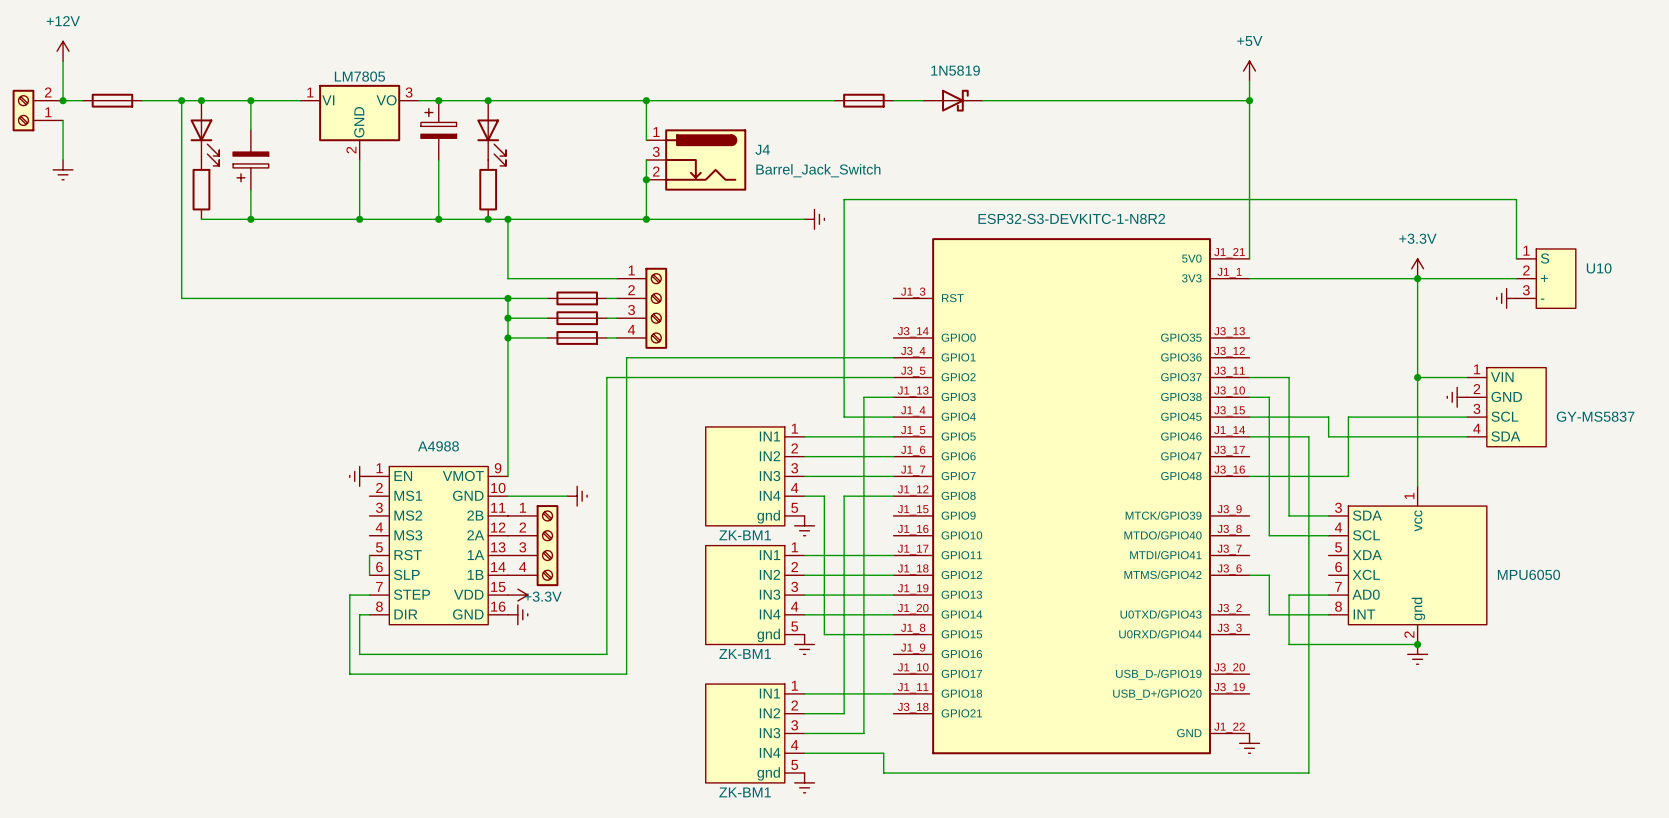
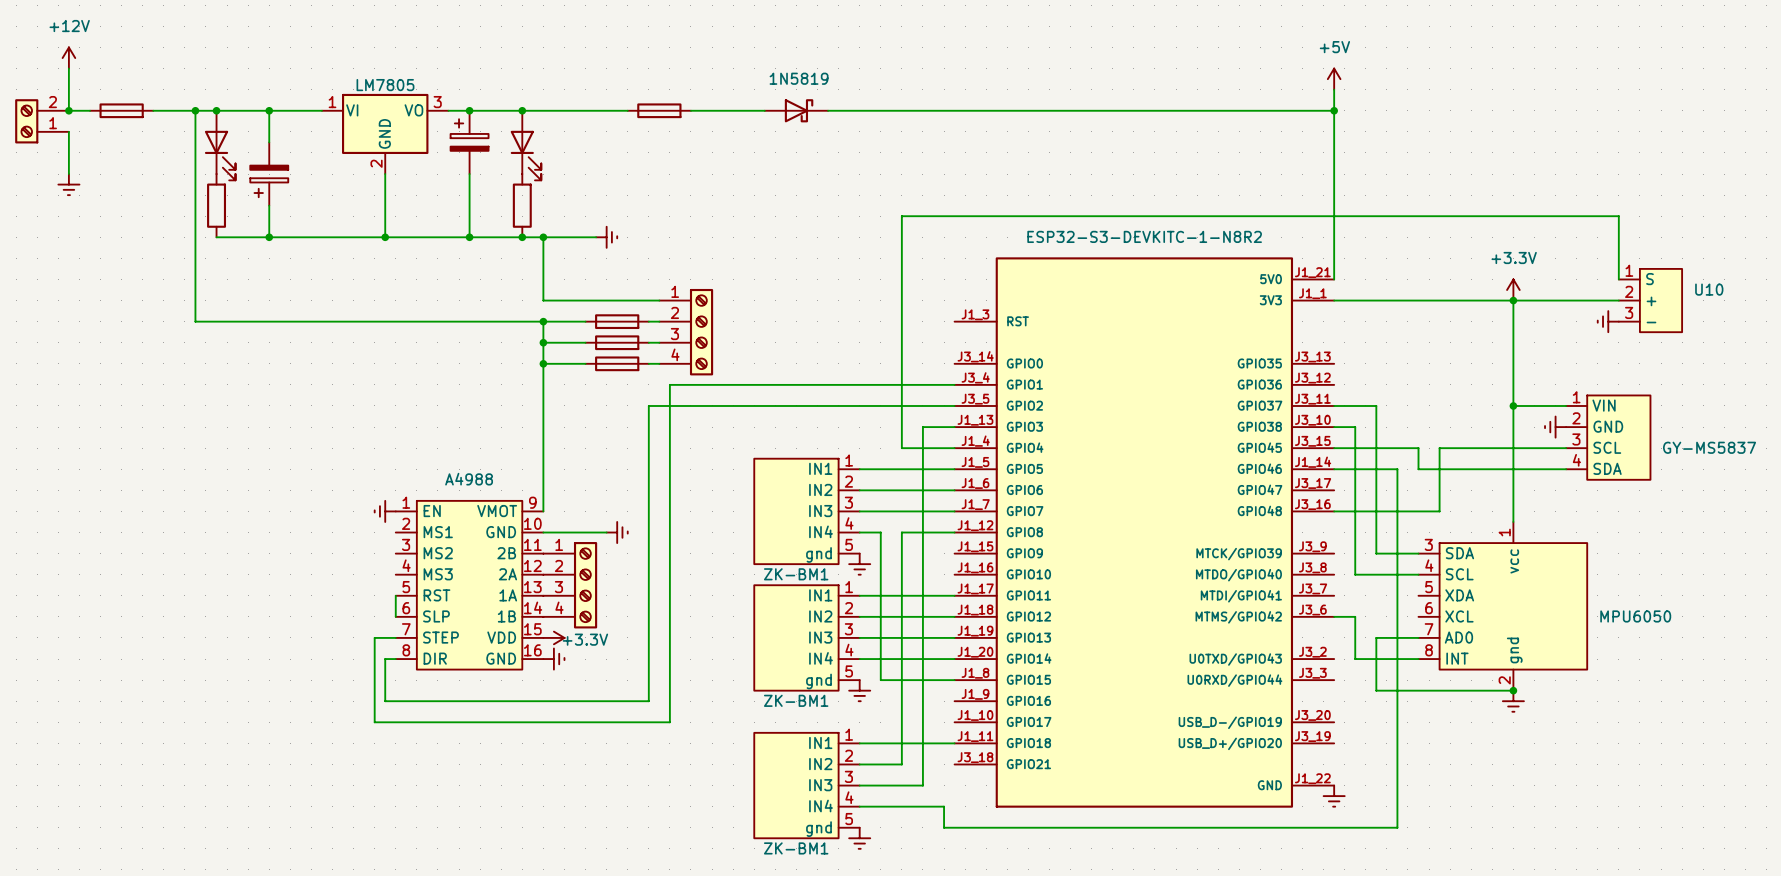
wire: (587, 100) (646, 100) (646, 140) -> none
part: none -> (659, 110)
junction: (646, 100) -> none
part: none -> 1N5819 (796, 110)
part: (863, 100) -> none
part: 1N5819 (952, 100) -> none
wire: (646, 160) (646, 219) -> none
J4: Barrel_Jack_Switch (696, 160) -> none
junction: (646, 179) -> none
wire: (557, 219) (804, 219) -> none
power symbol: none -> (606, 237)
junction: (646, 219) -> none
power symbol: (814, 219) -> none

